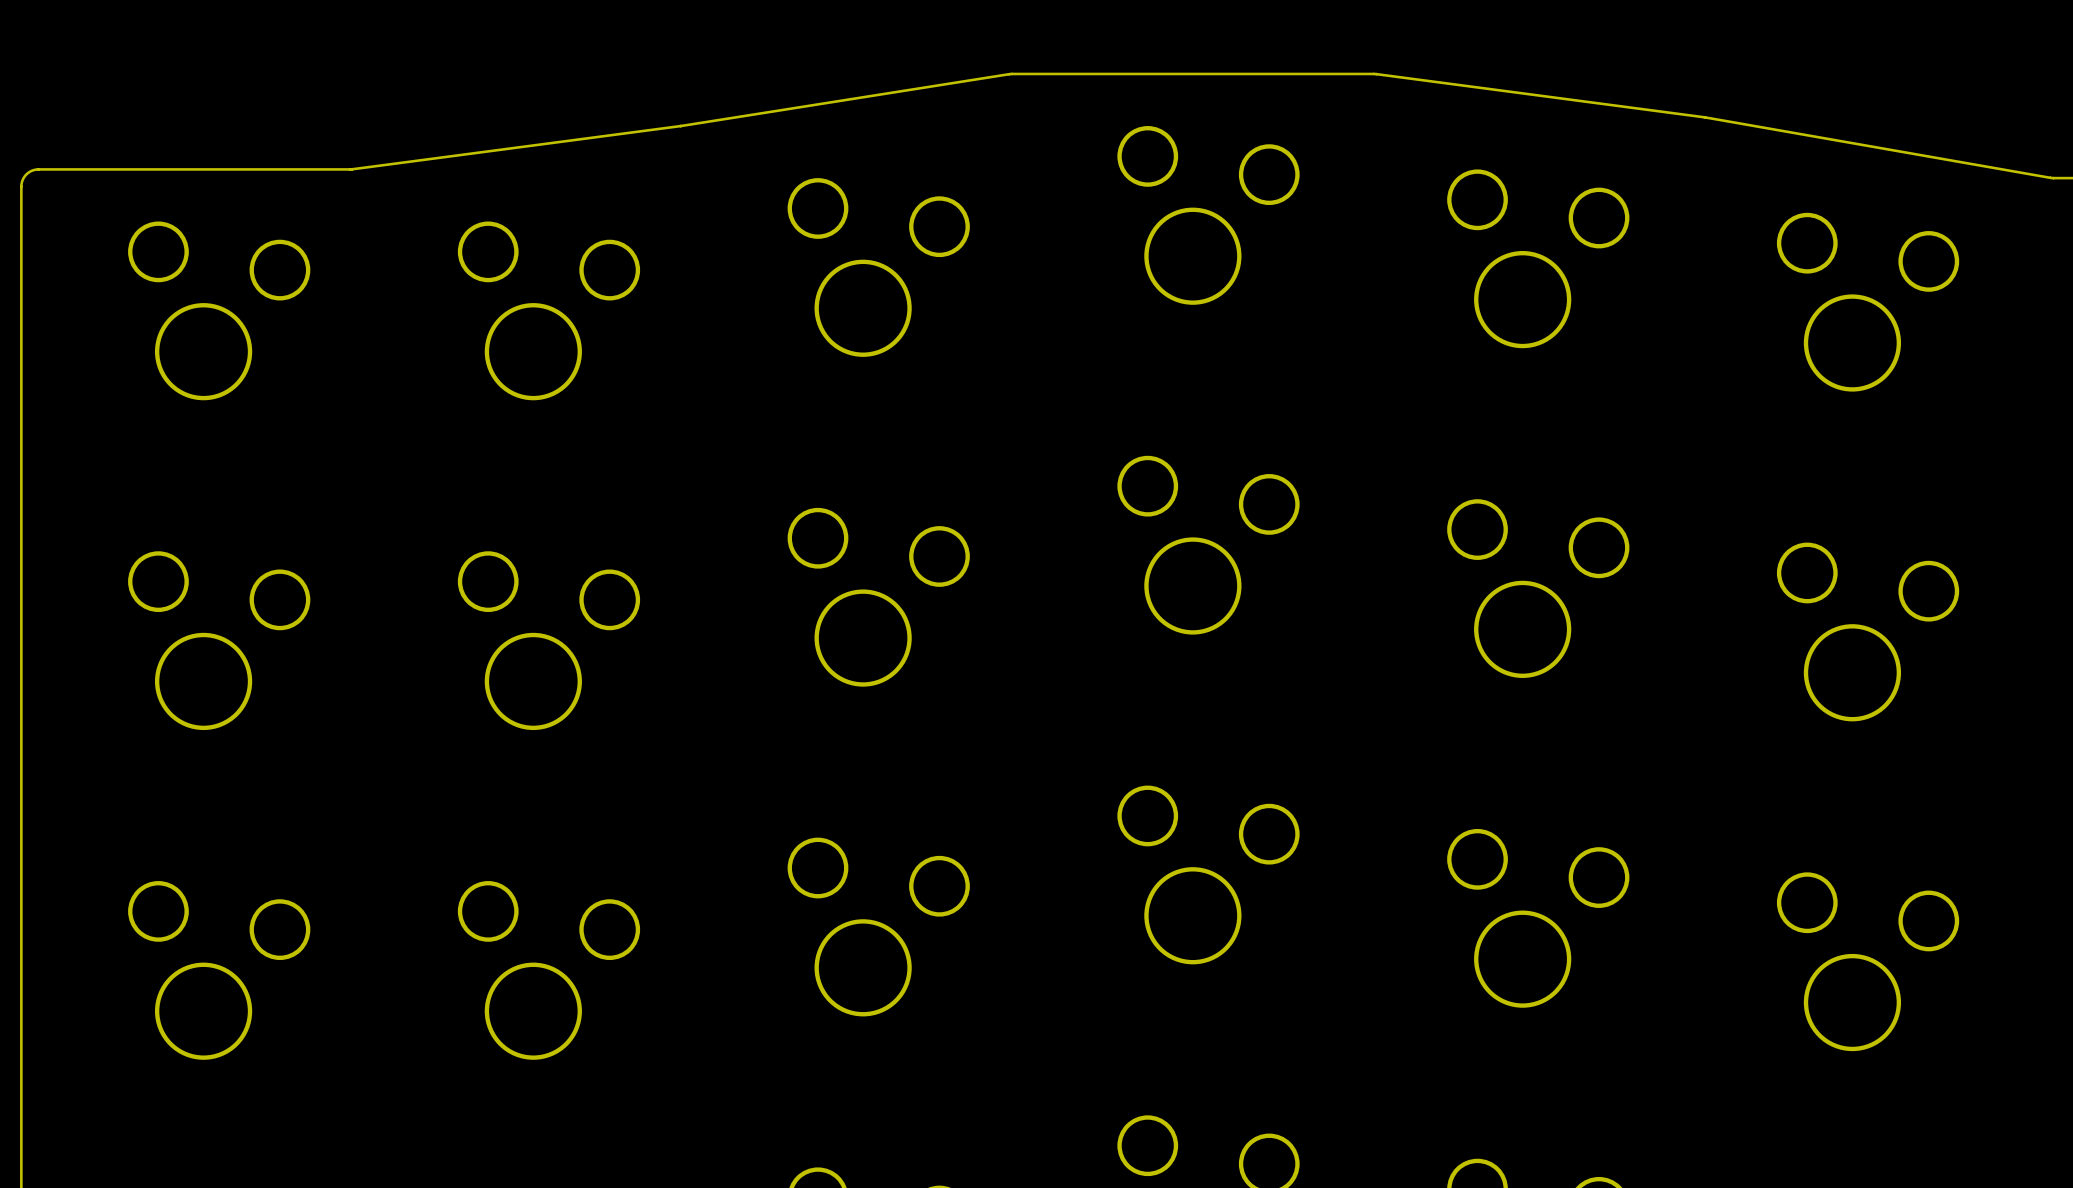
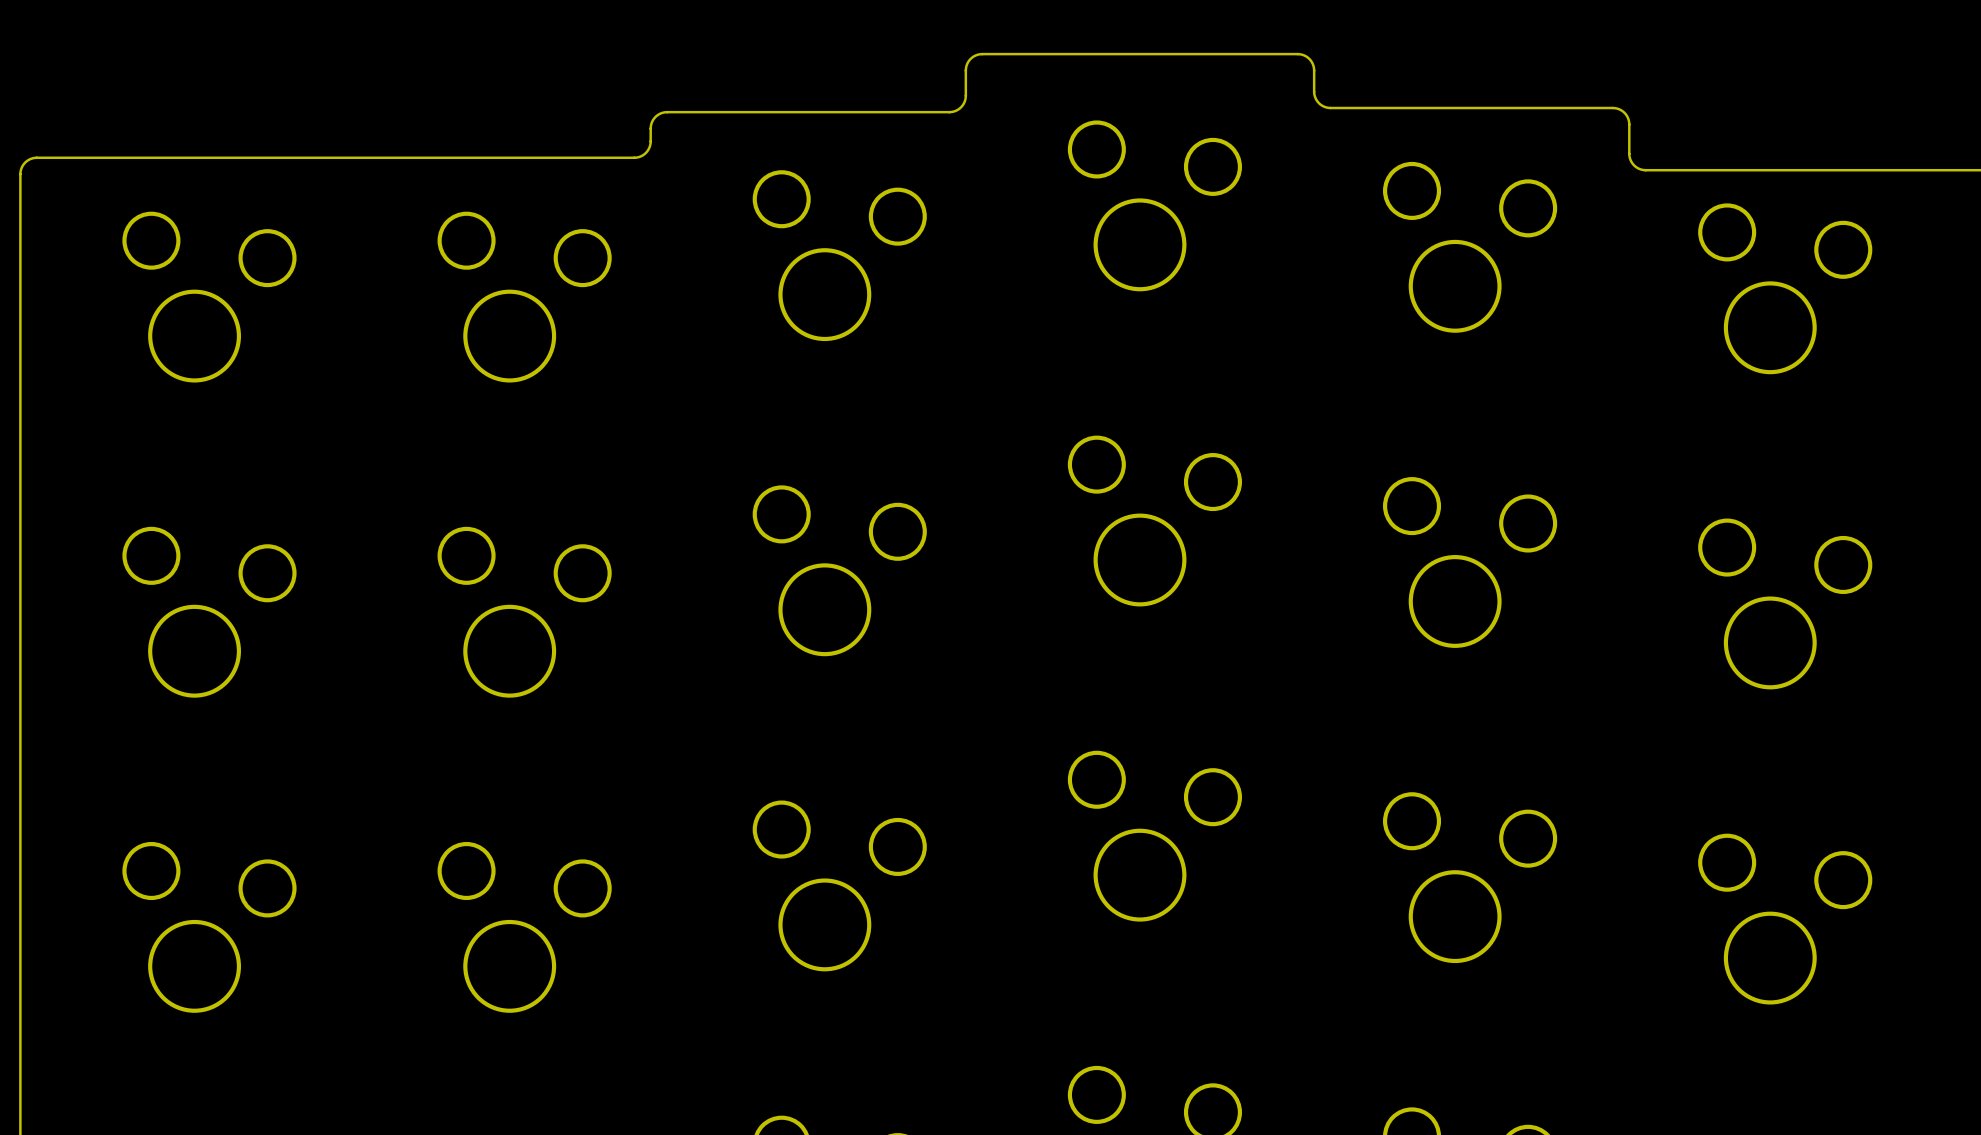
board edge: (2053, 178) (1704, 117) (1376, 74) (1011, 73) (680, 126) (352, 169) (38, 169) (26, 174) (21, 186) -> (1962, 170) (1643, 170) (1635, 166) (1630, 160) (1628, 120) (1622, 111) (1615, 108) (1328, 107) (1320, 104) (1315, 97) (1311, 62) (1307, 57) (1299, 54) (982, 54) (974, 56) (968, 62) (965, 68) (965, 99) (961, 107) (953, 111) (664, 112) (657, 115) (651, 122) (648, 149) (644, 154) (636, 157) (36, 157) (28, 159) (23, 164) (20, 178)

